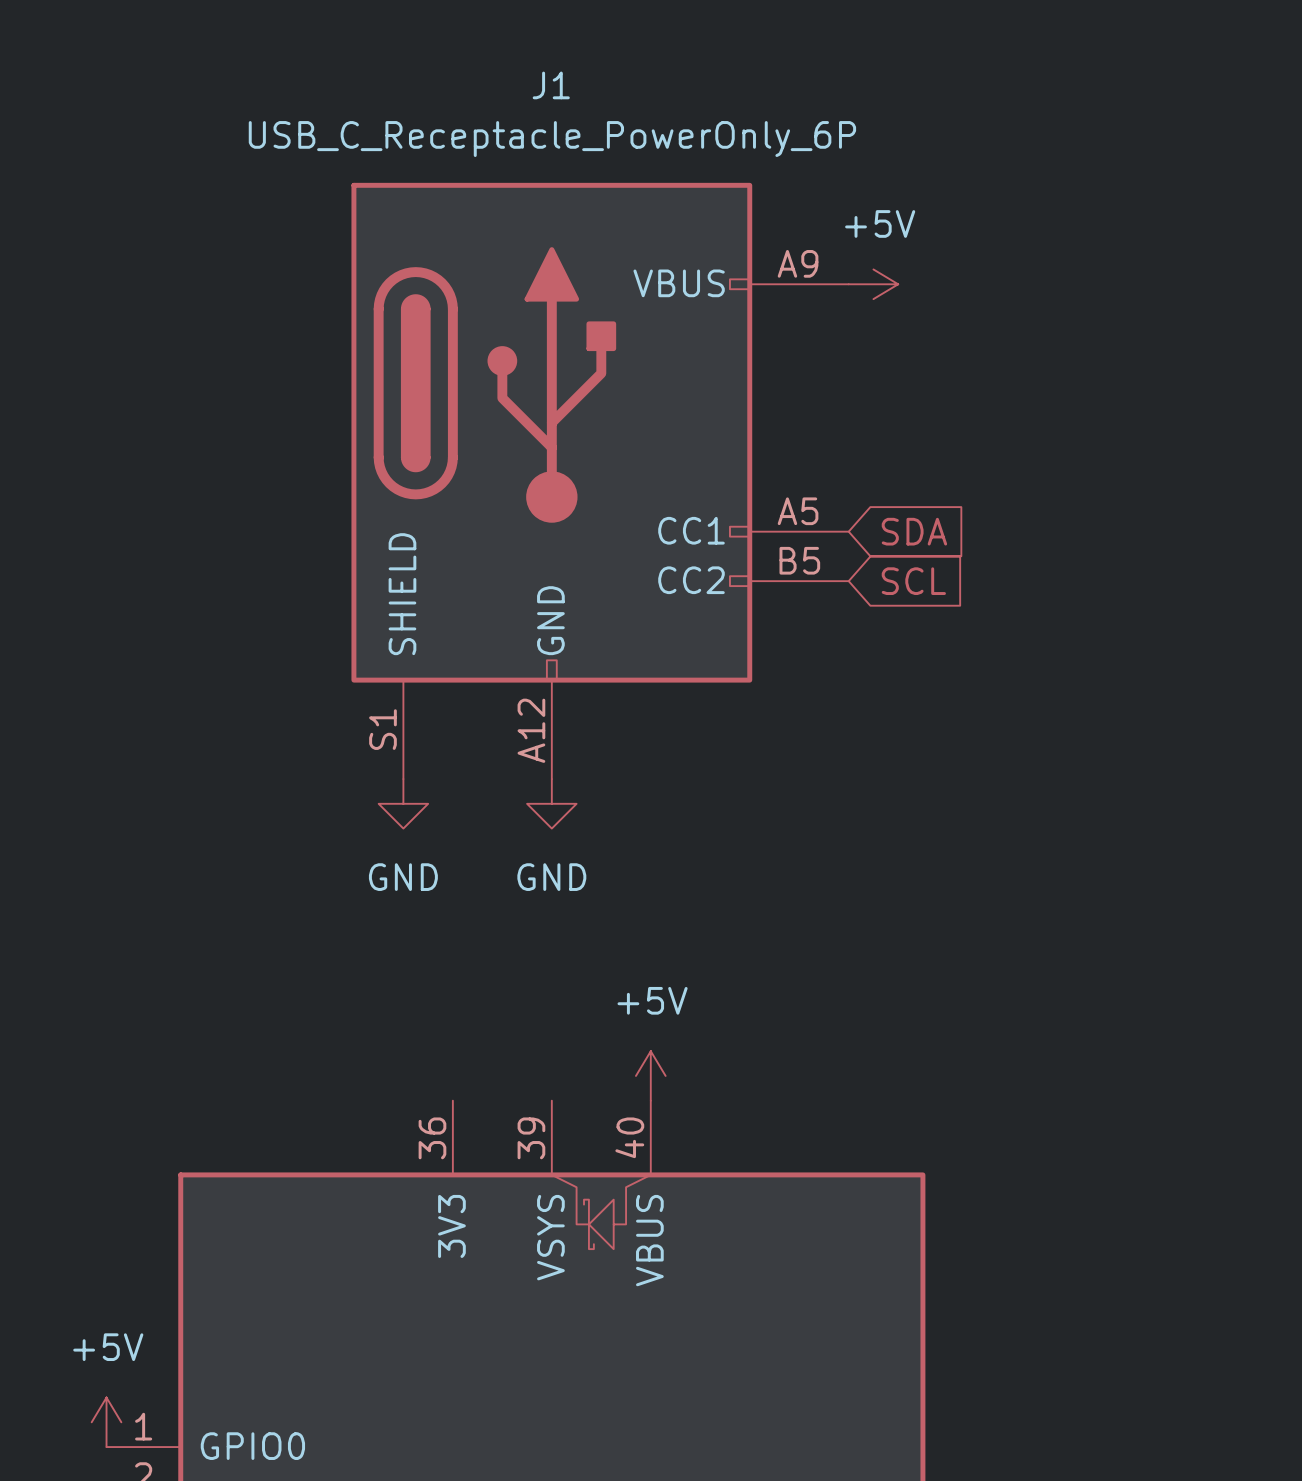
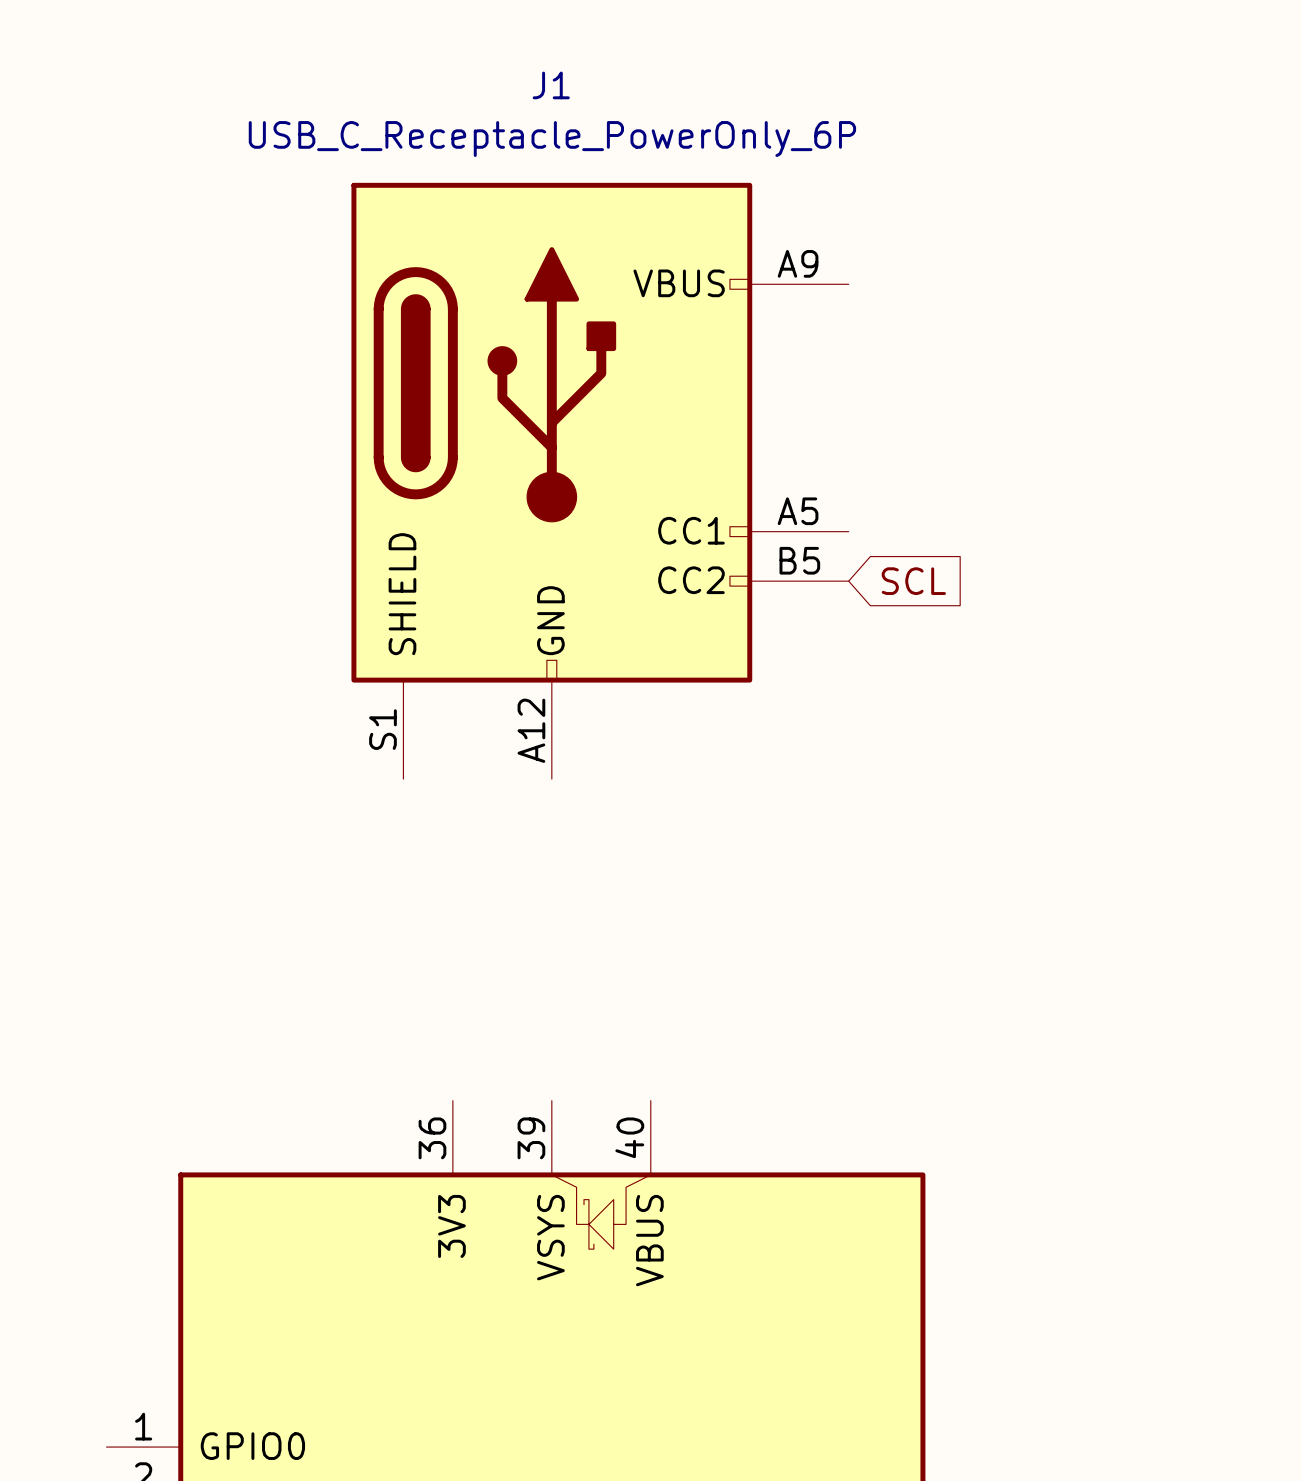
power symbol: +5V (873, 284) -> none
global label: SDA (914, 531) -> none
power symbol: GND (403, 803) -> none
power symbol: GND (551, 803) -> none
power symbol: +5V (650, 1075) -> none
power symbol: +5V (106, 1422) -> none

